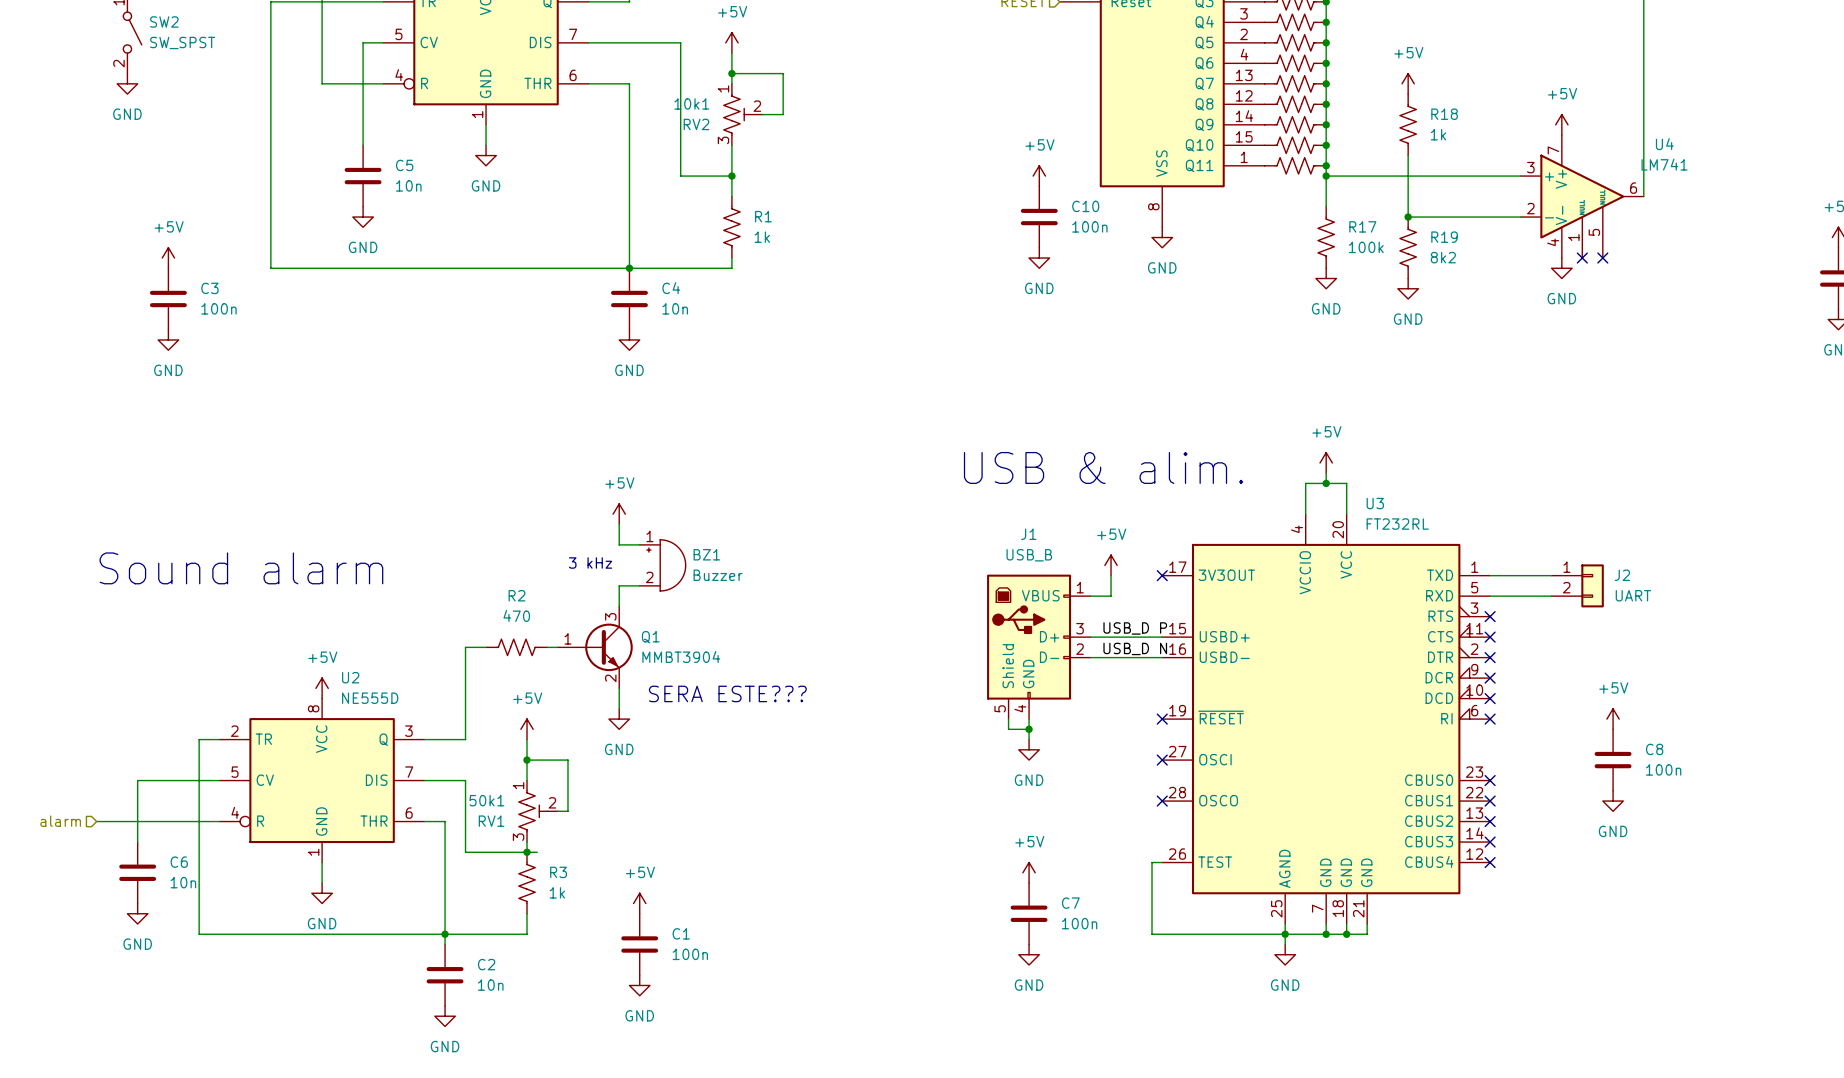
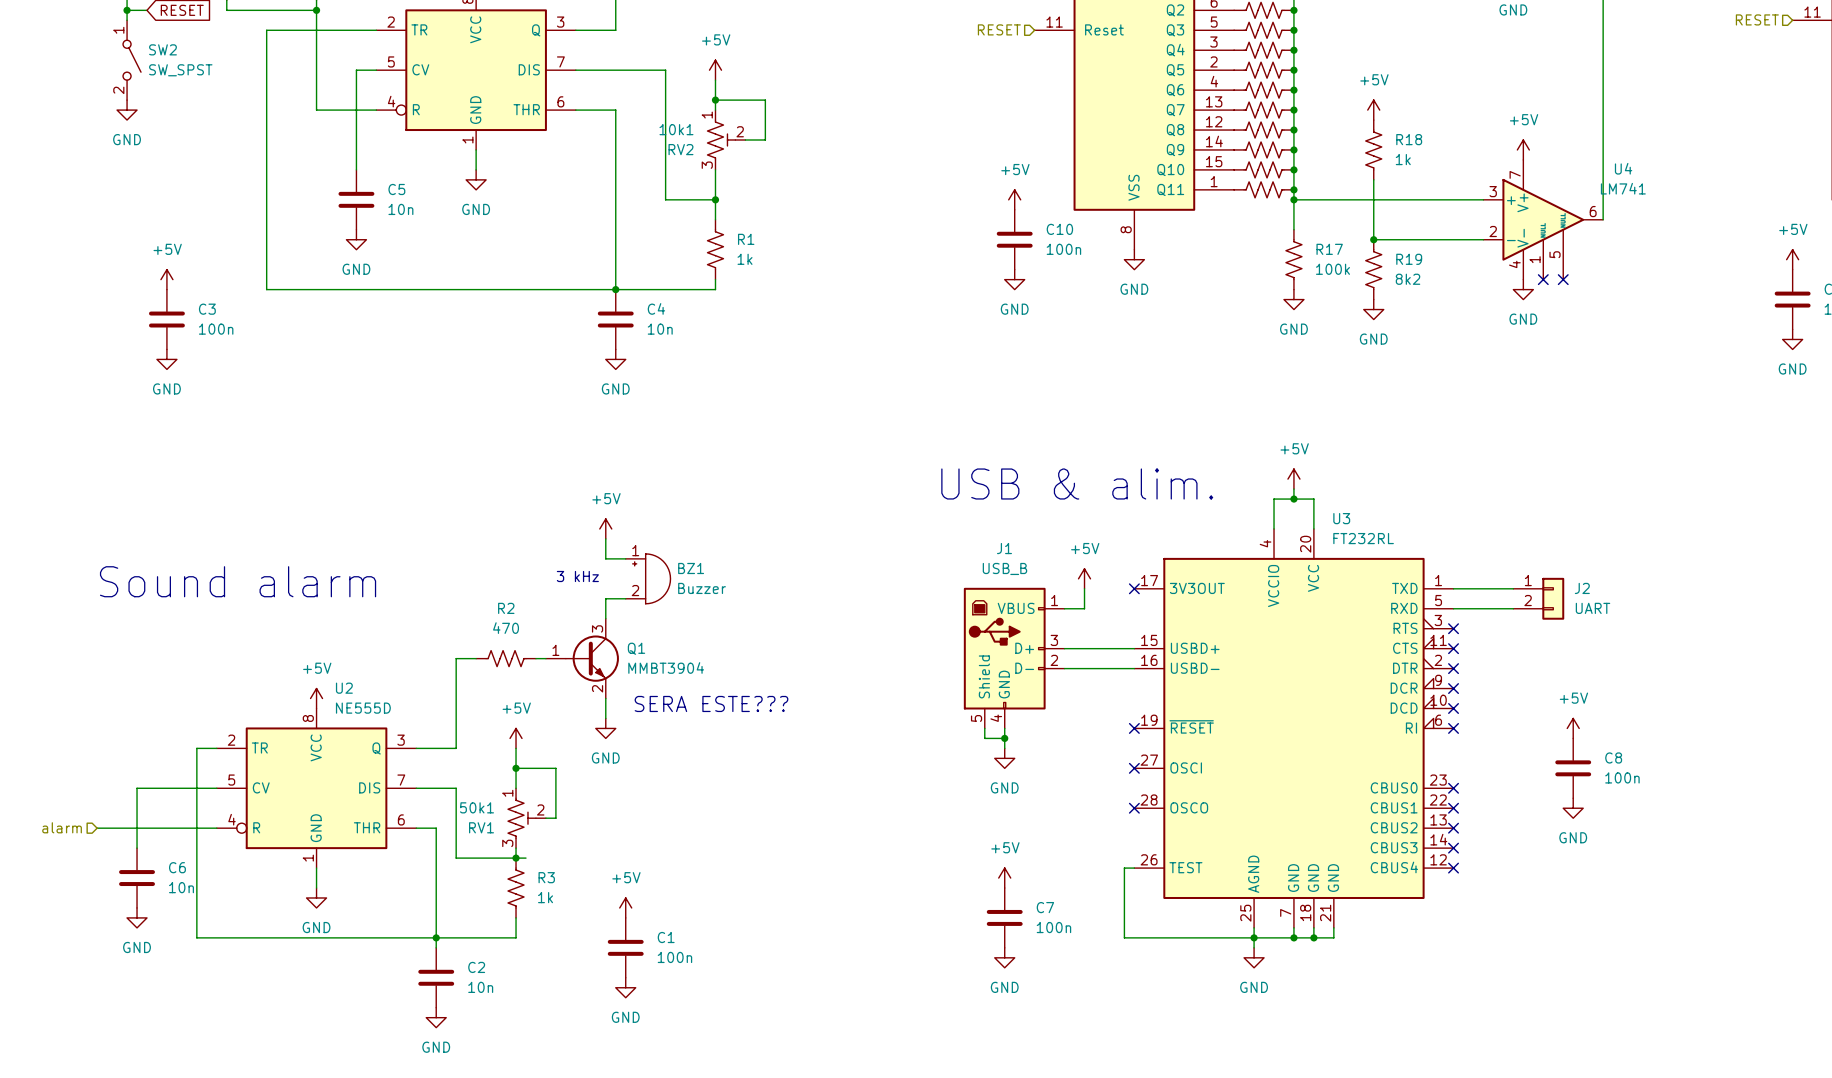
label: USB_D P (1135, 628) -> none
label: USB_D N (1135, 648) -> none

